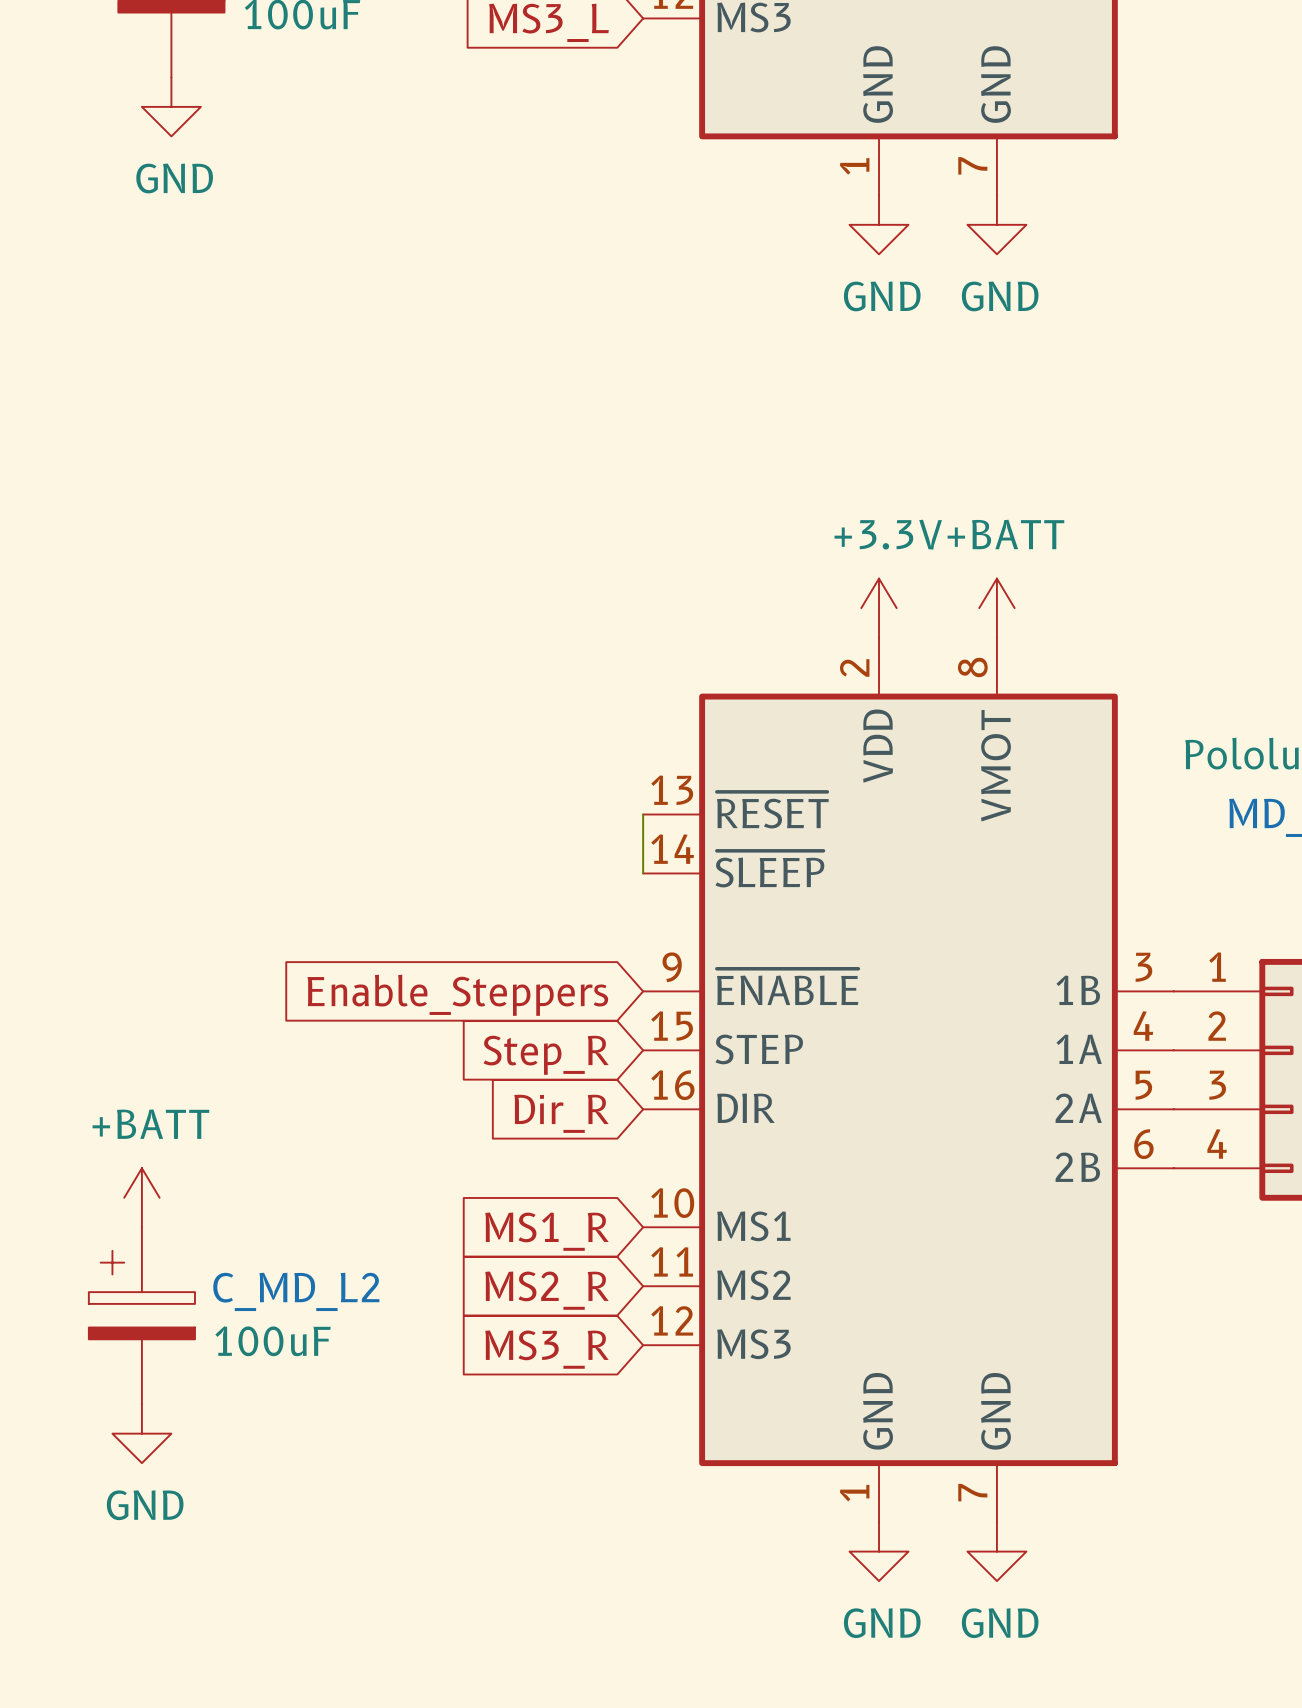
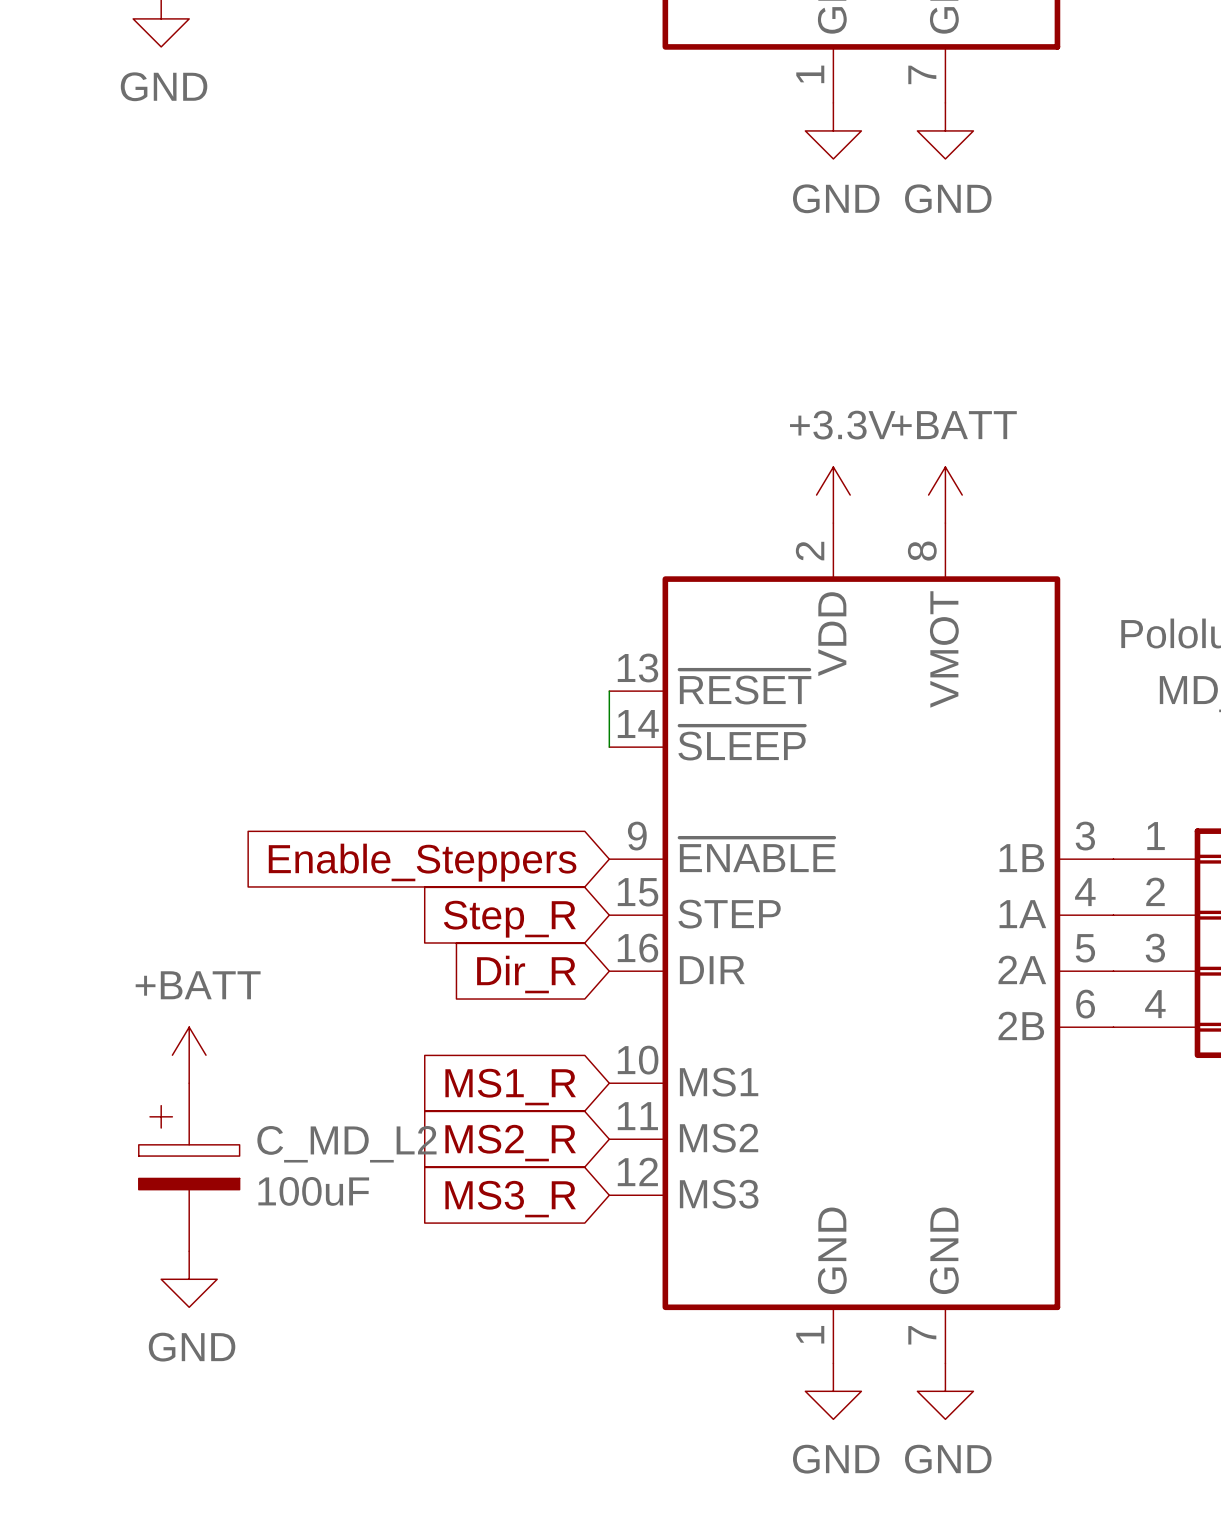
power symbol position: +BATT (141, 1197) -> +BATT (189, 1055)
C_MD_L2 position: (141, 1315) -> (189, 1167)
power symbol position: GND (141, 1433) -> GND (189, 1279)

